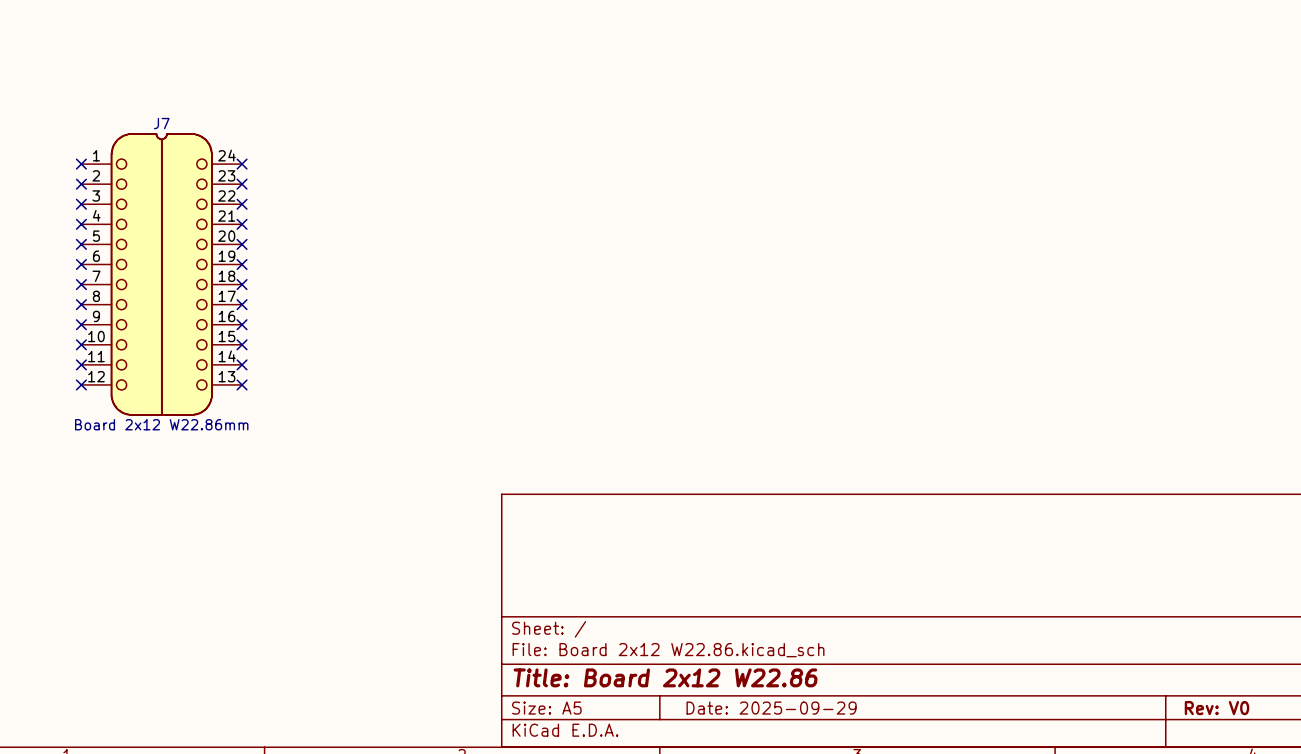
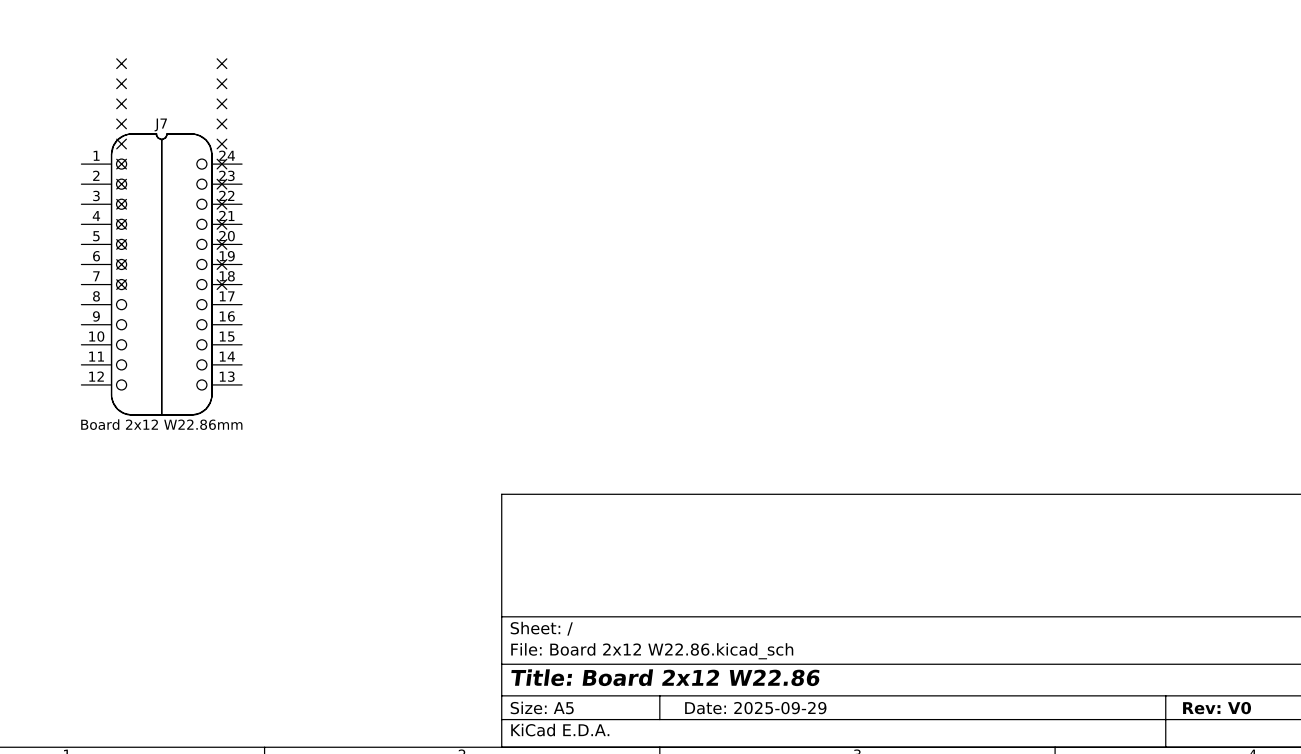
no-connect mark: none -> (121, 63)
no-connect mark: none -> (221, 63)
no-connect mark: none -> (121, 83)
no-connect mark: none -> (221, 83)
no-connect mark: none -> (121, 103)
no-connect mark: none -> (221, 103)
no-connect mark: none -> (121, 123)
no-connect mark: none -> (221, 123)
no-connect mark: none -> (121, 144)
no-connect mark: none -> (221, 144)
no-connect mark: (81, 164) -> none
no-connect mark: none -> (121, 164)
no-connect mark: none -> (221, 164)
no-connect mark: (242, 164) -> none
no-connect mark: (81, 184) -> none
no-connect mark: none -> (121, 184)
no-connect mark: none -> (221, 184)
no-connect mark: (242, 184) -> none
no-connect mark: (81, 204) -> none
no-connect mark: none -> (121, 204)
no-connect mark: none -> (221, 204)
no-connect mark: (242, 204) -> none
no-connect mark: (81, 224) -> none
no-connect mark: none -> (121, 224)
no-connect mark: none -> (221, 224)
no-connect mark: (242, 224) -> none
no-connect mark: (81, 244) -> none
no-connect mark: none -> (121, 244)
no-connect mark: none -> (221, 244)
no-connect mark: (242, 244) -> none
no-connect mark: (81, 264) -> none
no-connect mark: none -> (121, 264)
no-connect mark: none -> (221, 264)
no-connect mark: (242, 264) -> none
no-connect mark: (81, 284) -> none
no-connect mark: none -> (121, 284)
no-connect mark: none -> (221, 284)
no-connect mark: (242, 284) -> none
no-connect mark: (81, 304) -> none
no-connect mark: (242, 304) -> none
no-connect mark: (81, 324) -> none
no-connect mark: (242, 324) -> none
no-connect mark: (81, 344) -> none
no-connect mark: (242, 344) -> none
no-connect mark: (81, 364) -> none
no-connect mark: (242, 364) -> none
no-connect mark: (81, 384) -> none
no-connect mark: (242, 384) -> none

